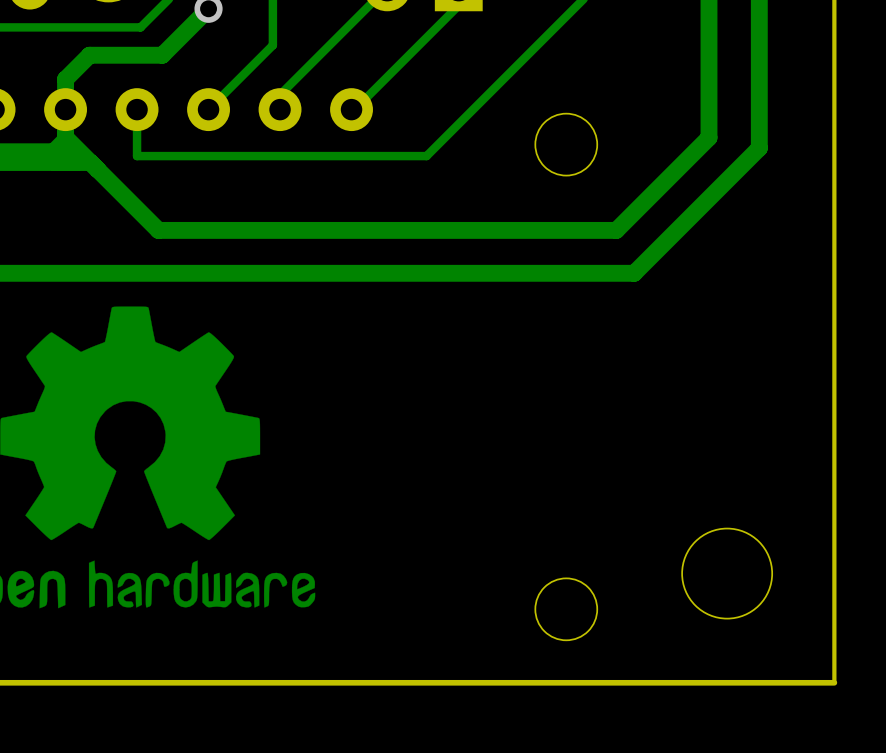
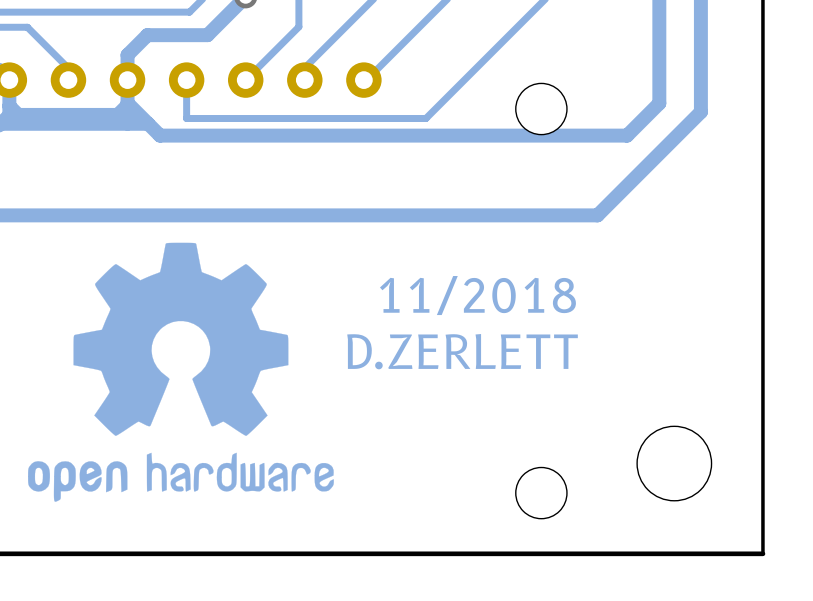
track: (669, 176) (616, 230) (158, 230) (104, 176) -> (627, 135) (160, 135)
text: none -> 11/2018 (477, 295)
text: none -> D.ZERLETT (462, 351)

